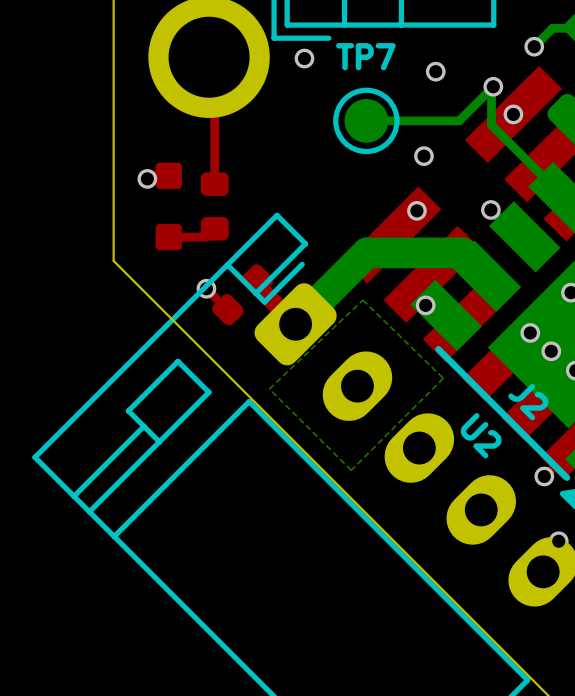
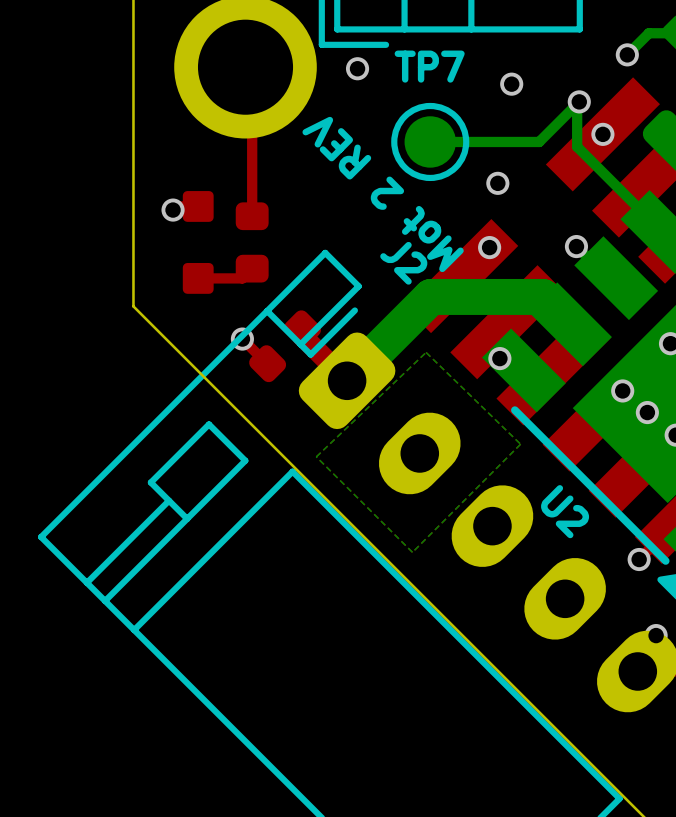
text: none -> Mot 2 REV (383, 194)
J2 name position: J2 (528, 402) -> J2 (403, 263)

